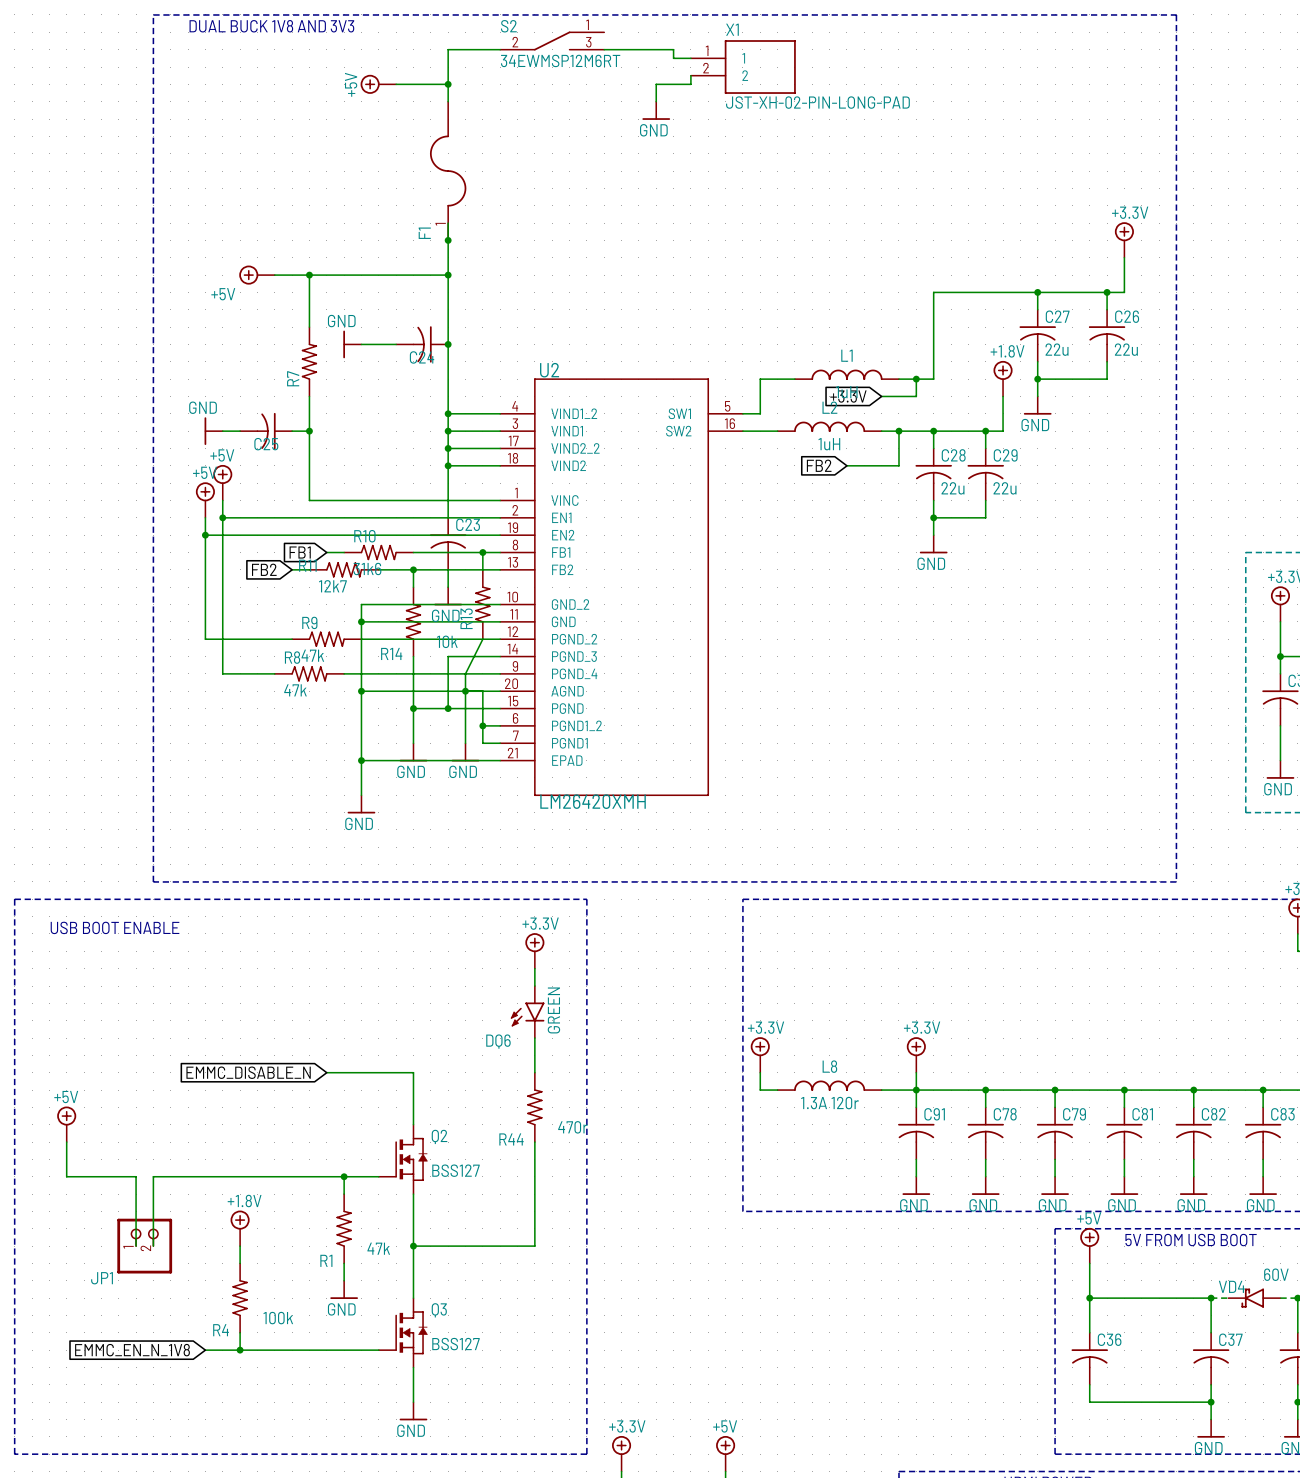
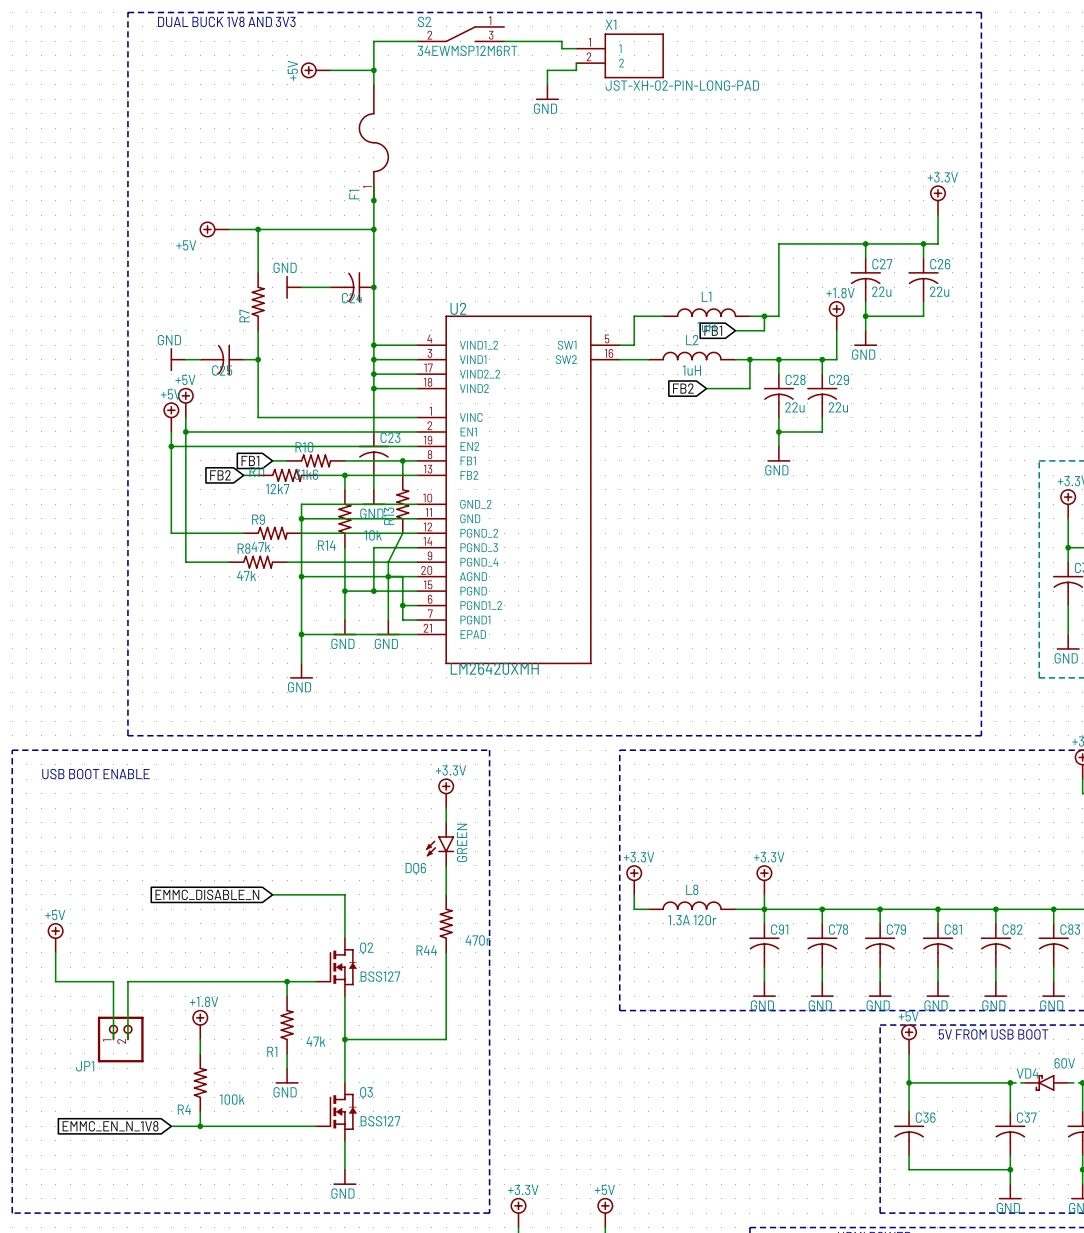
global label: +3.3V (848, 396) -> FB1 (713, 330)

